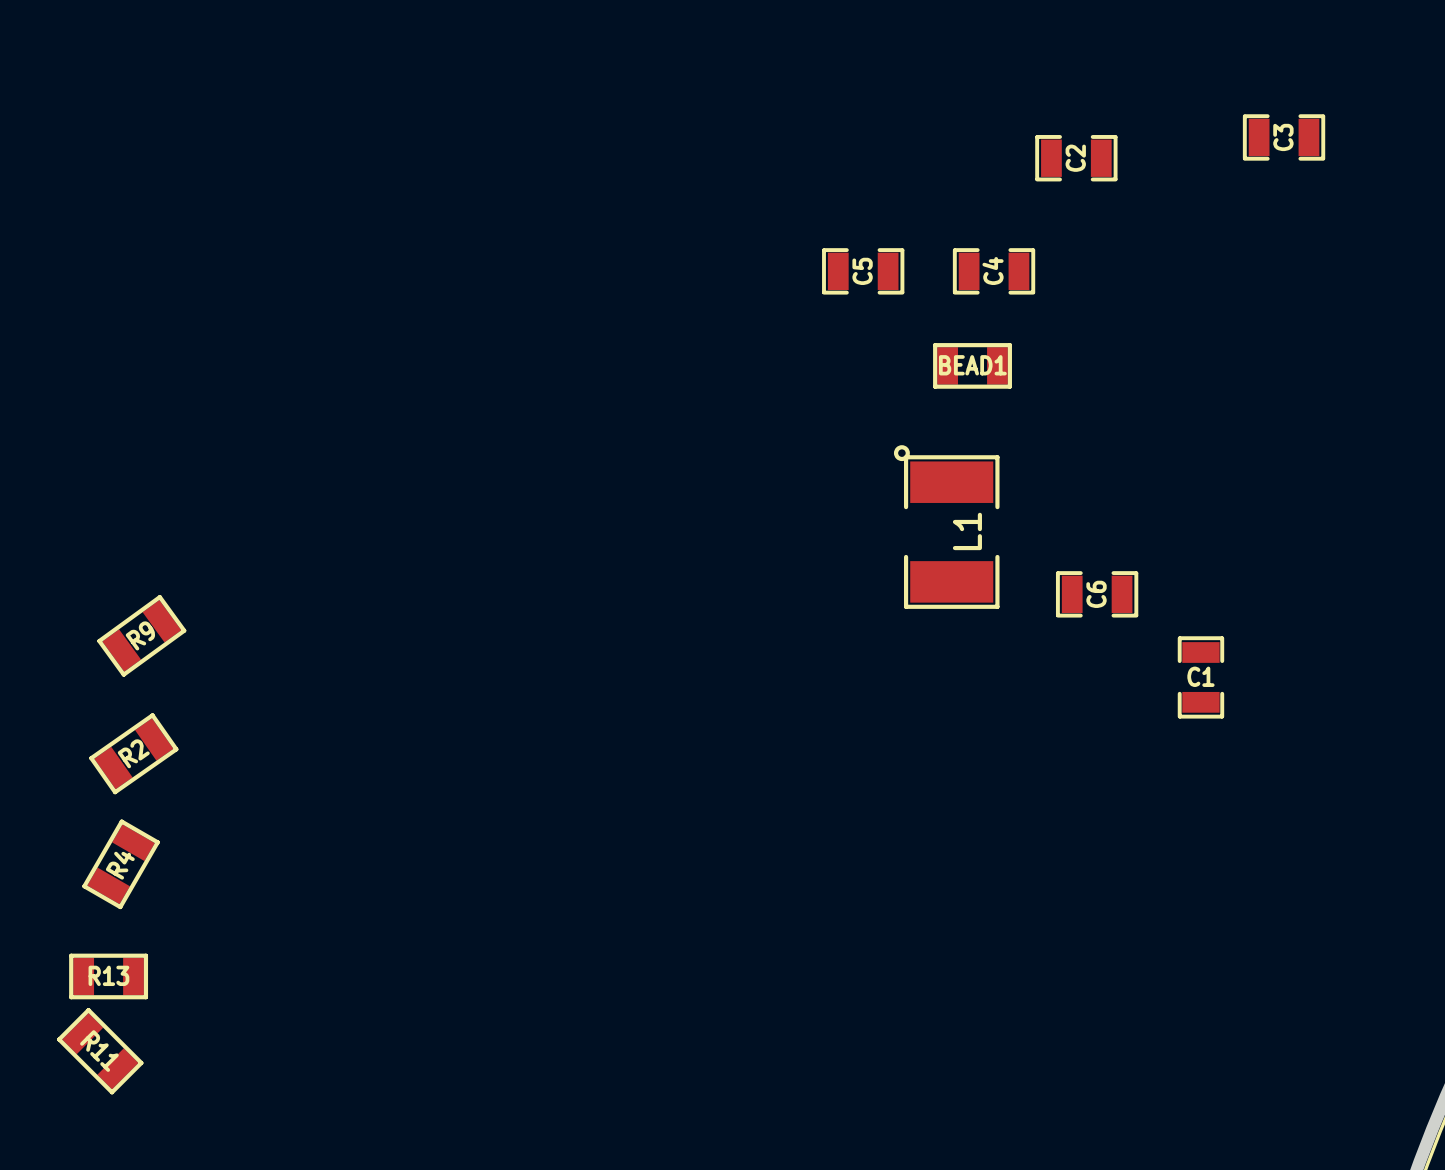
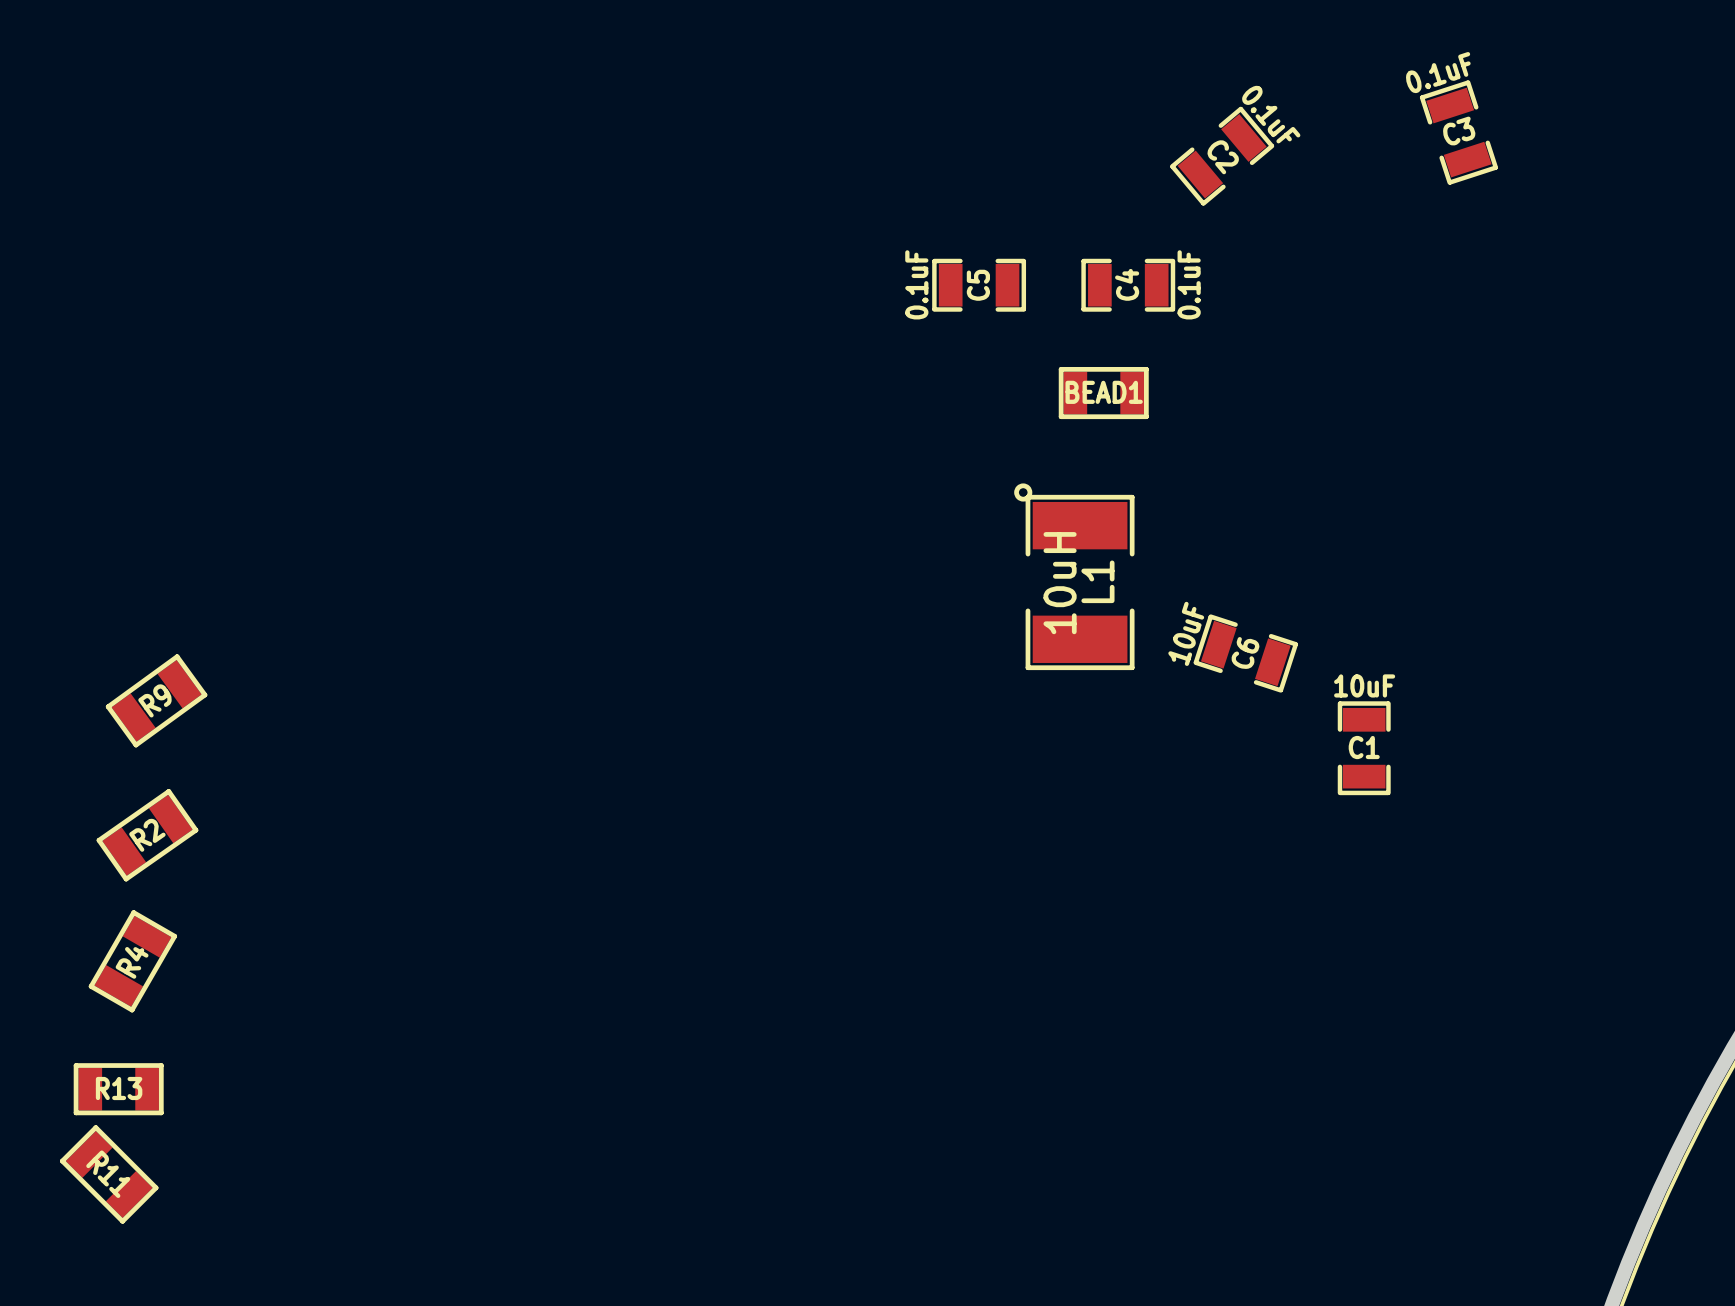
C3 value: none -> 0.1uF (1438, 72)
C2 value: none -> 0.1uF (1271, 114)
C3 rotation: 0° (1284, 137) -> 72° clockwise (1458, 132)
C2 rotation: 0° (1076, 158) -> 40° counterclockwise (1222, 156)
C5 value: none -> 0.1uF (916, 284)
C4 value: none -> 0.1uF (1189, 284)
L1 value: none -> 10uH (1060, 583)
C6 value: none -> 10uF (1186, 633)
C6 rotation: 0° (1097, 594) -> 18° clockwise (1245, 653)
C1 value: none -> 10uF (1364, 685)

